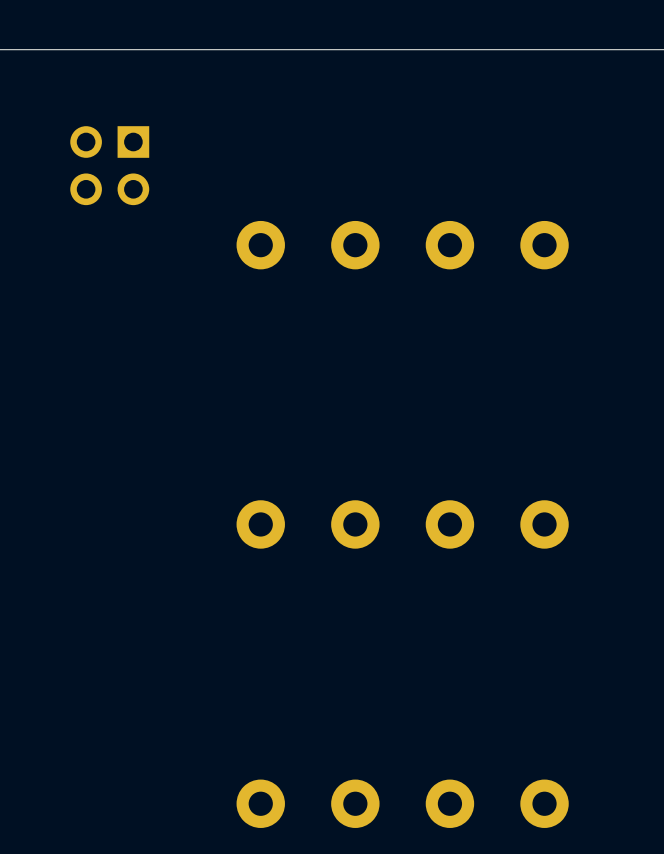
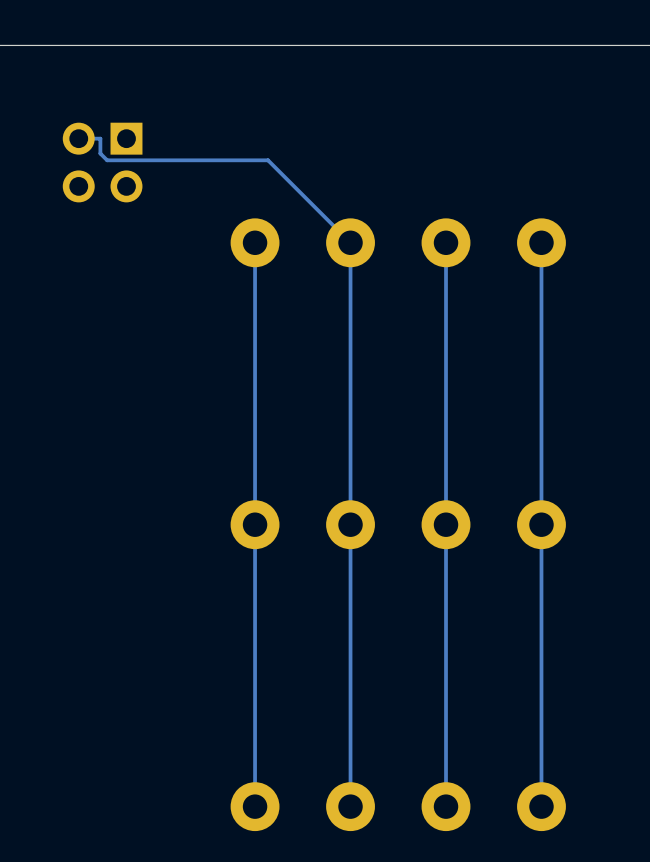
track: none -> (78, 138) (100, 138) (100, 153) (107, 160) (268, 160) (350, 242) (350, 806)
track: none -> (255, 242) (255, 806)
track: none -> (446, 242) (446, 806)
track: none -> (541, 242) (541, 806)

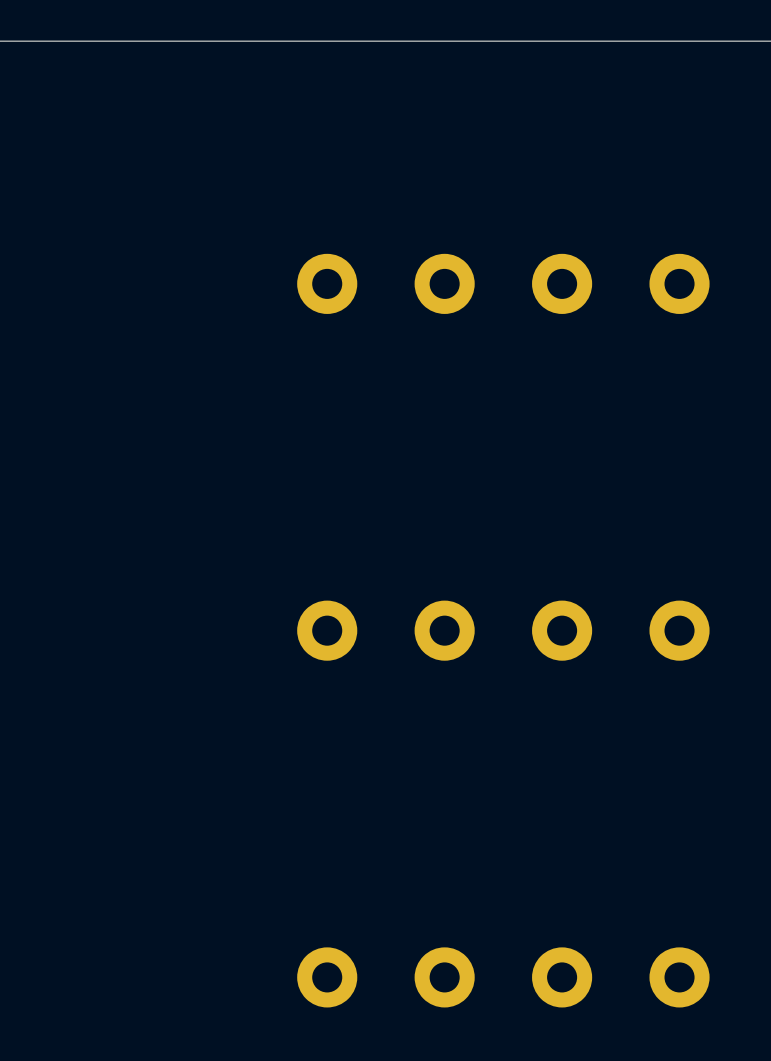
track: (78, 138) (100, 138) (100, 153) (107, 160) (268, 160) (350, 242) (350, 806) -> none
part: (102, 162) -> none
track: (255, 242) (255, 806) -> none
track: (446, 242) (446, 806) -> none
track: (541, 242) (541, 806) -> none

